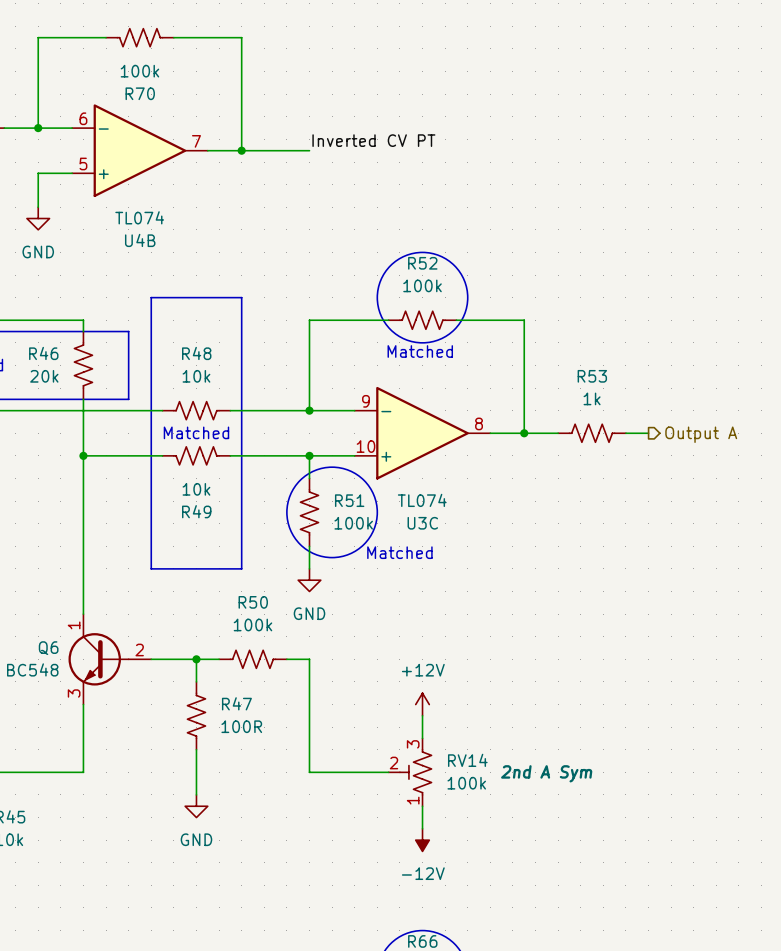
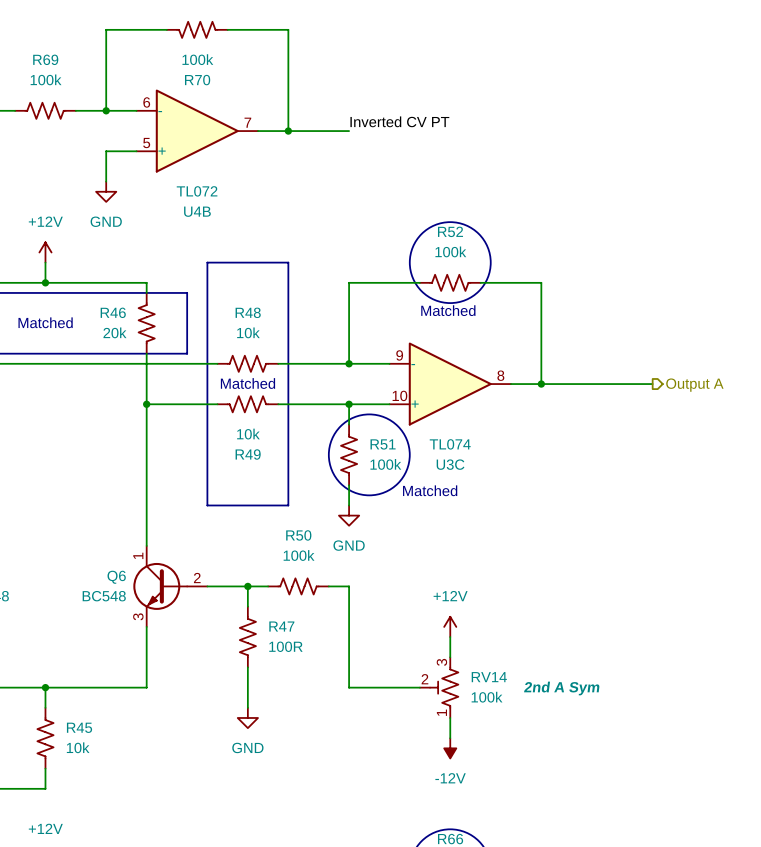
U4B value: TL074 (139, 217) -> TL072 (197, 191)
R53: 1k (592, 433) -> none

